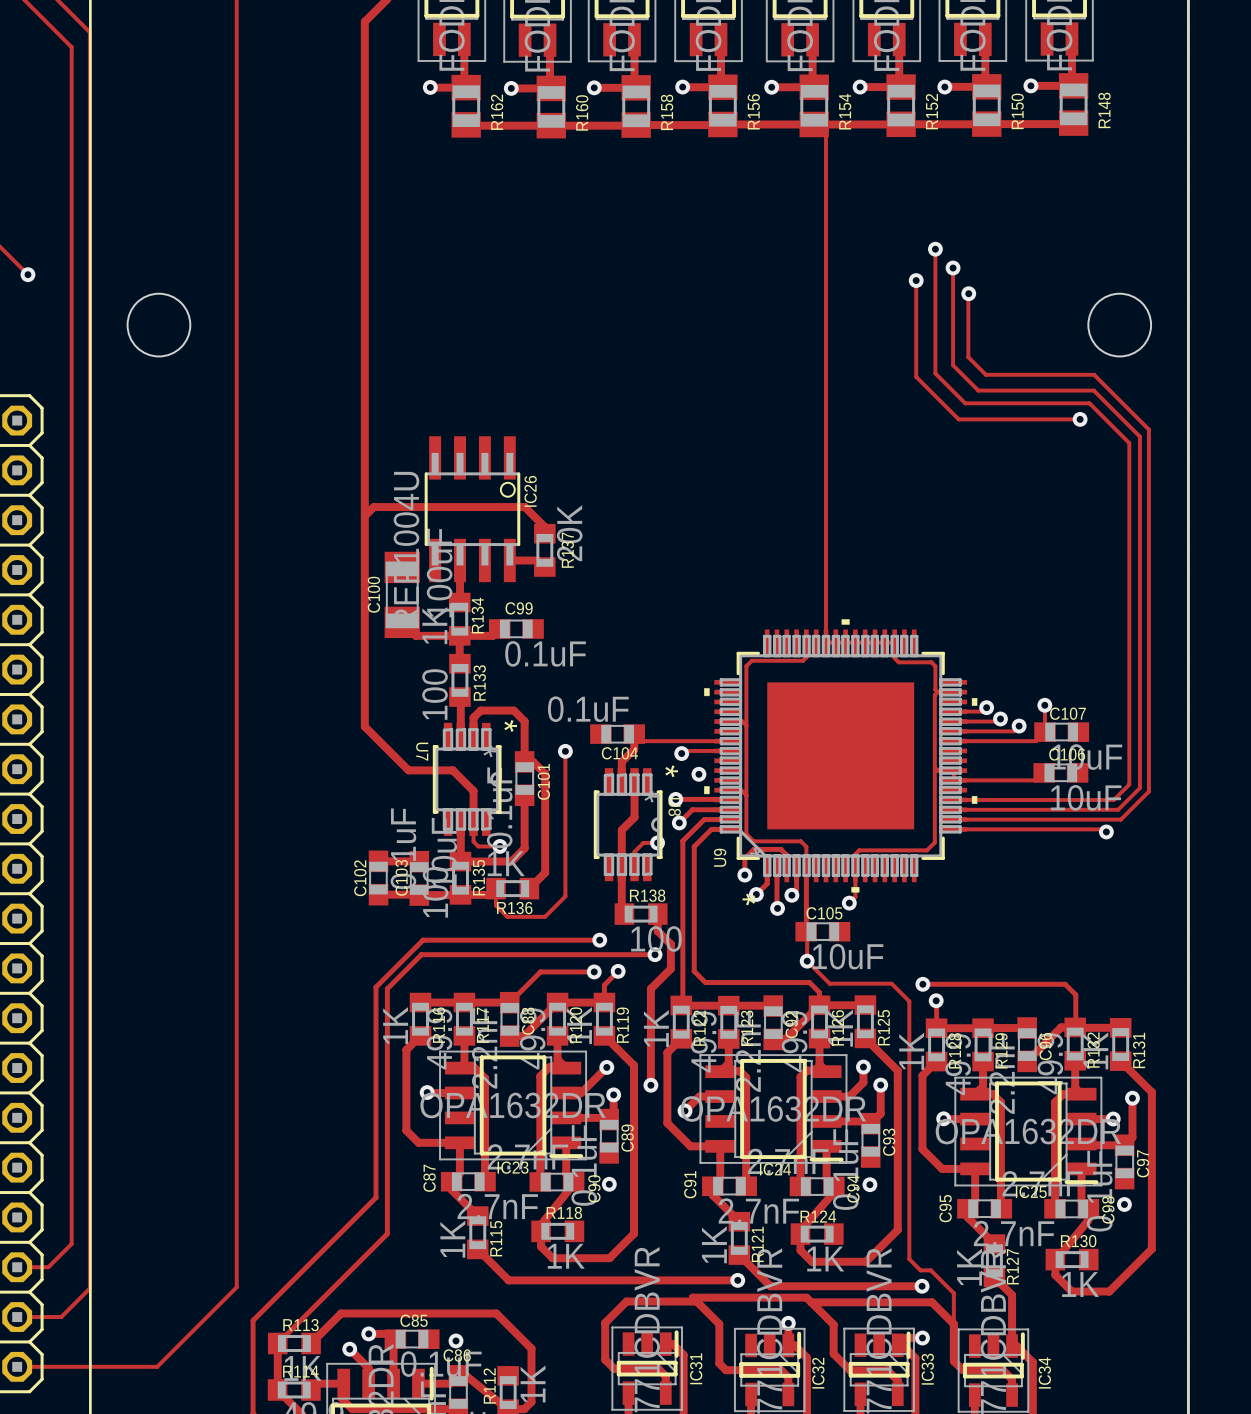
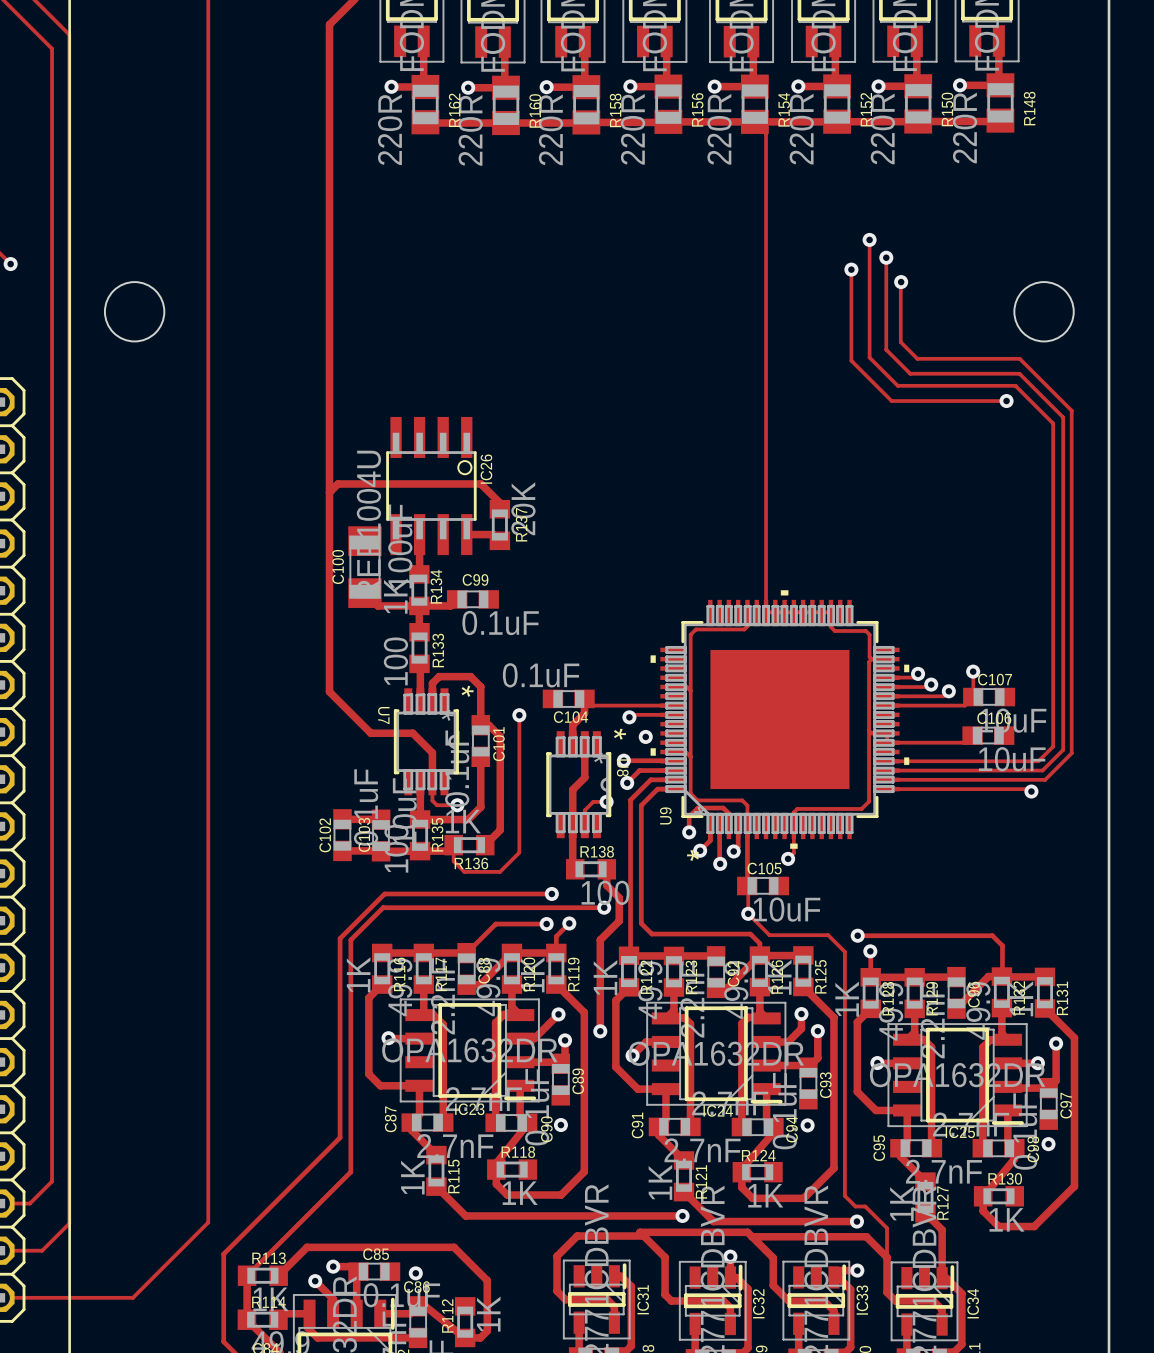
R148 value: none -> 220R (965, 127)
R150 value: none -> 220R (882, 128)
R162 value: none -> 220R (390, 129)
R158 value: none -> 220R (551, 129)
R156 value: none -> 220R (633, 129)
R154 value: none -> 220R (719, 129)
R152 value: none -> 220R (801, 129)
R160 value: none -> 220R (470, 130)

